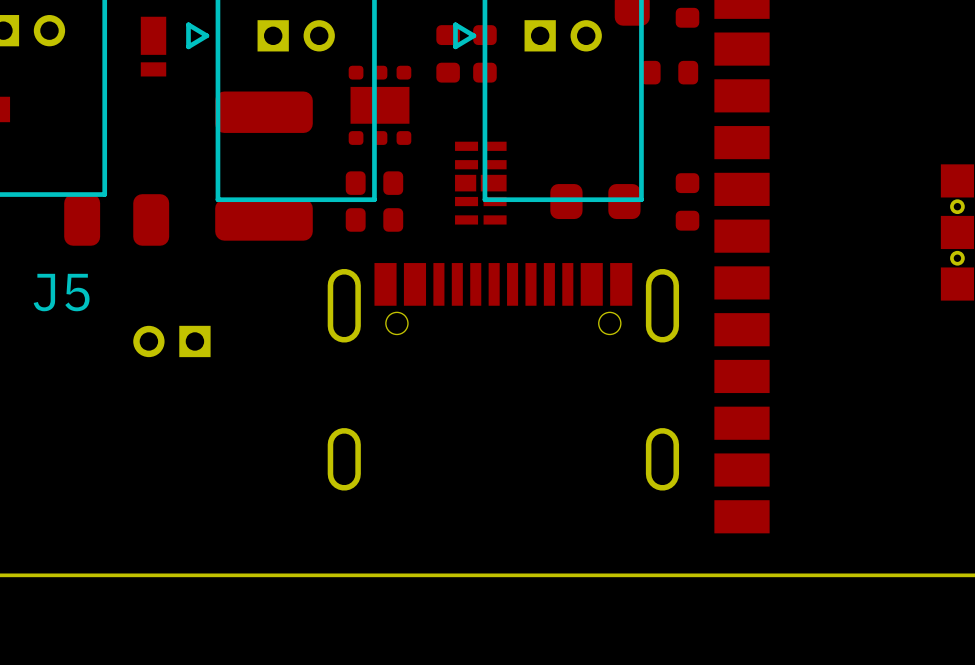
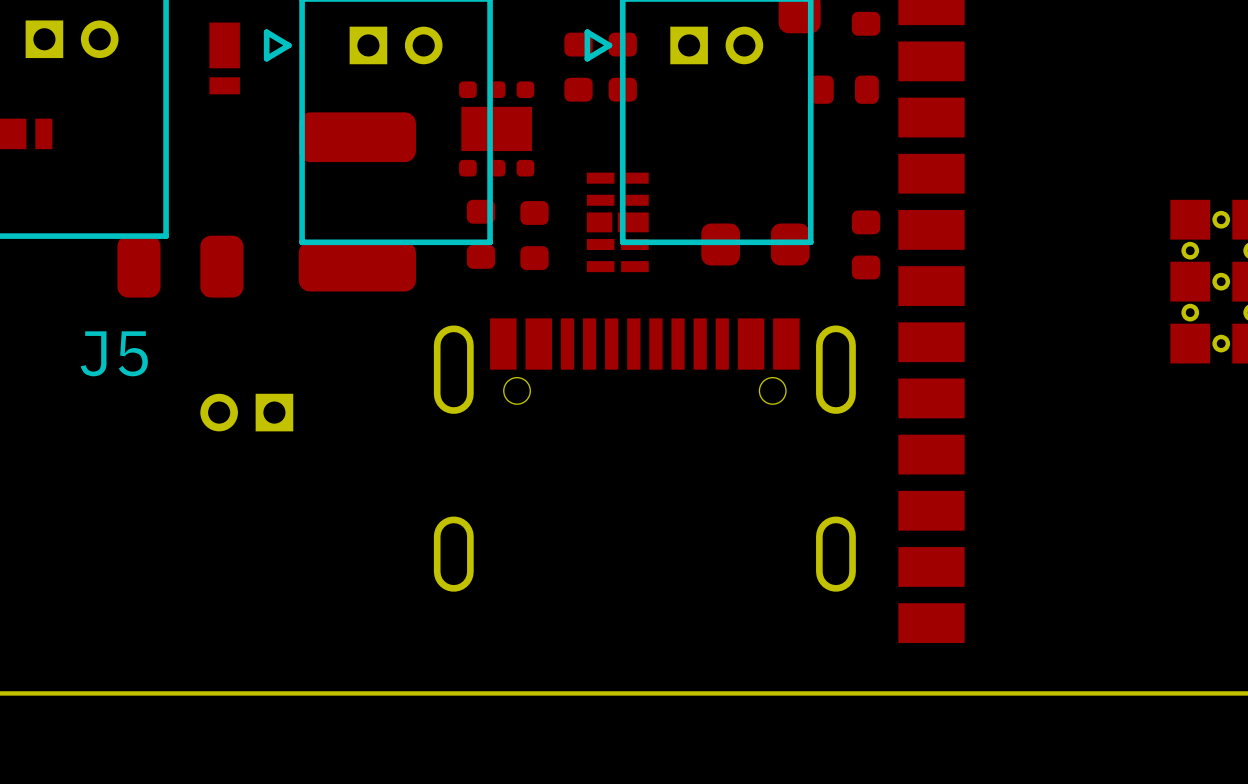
part rotation: 0° (374, 183) -> 90° clockwise (480, 234)
part rotation: 0° (374, 219) -> 90° clockwise (534, 235)
part position: (374, 219) -> (534, 235)

